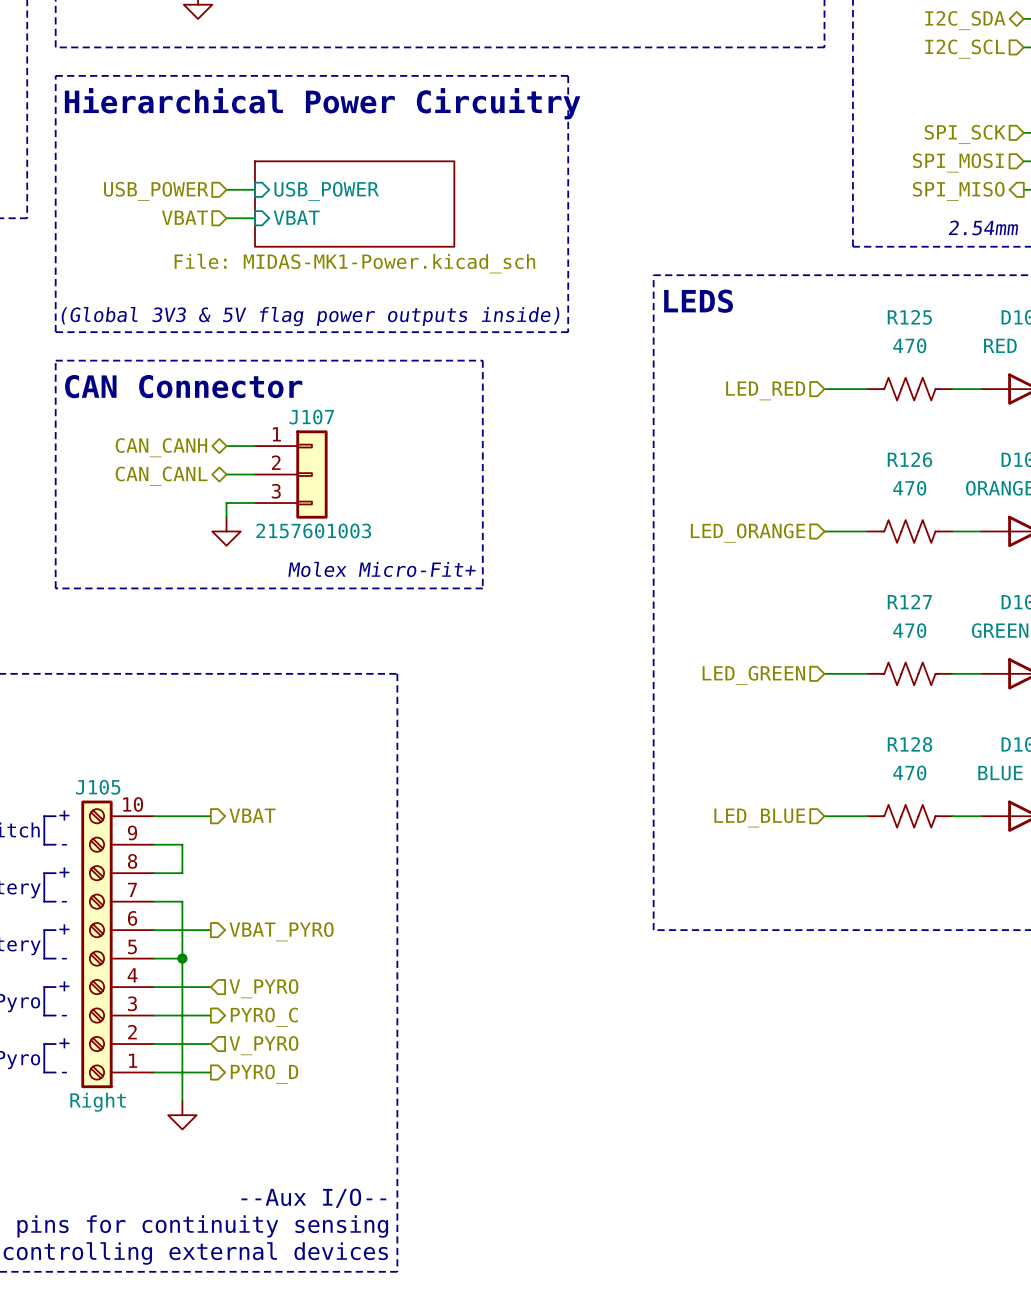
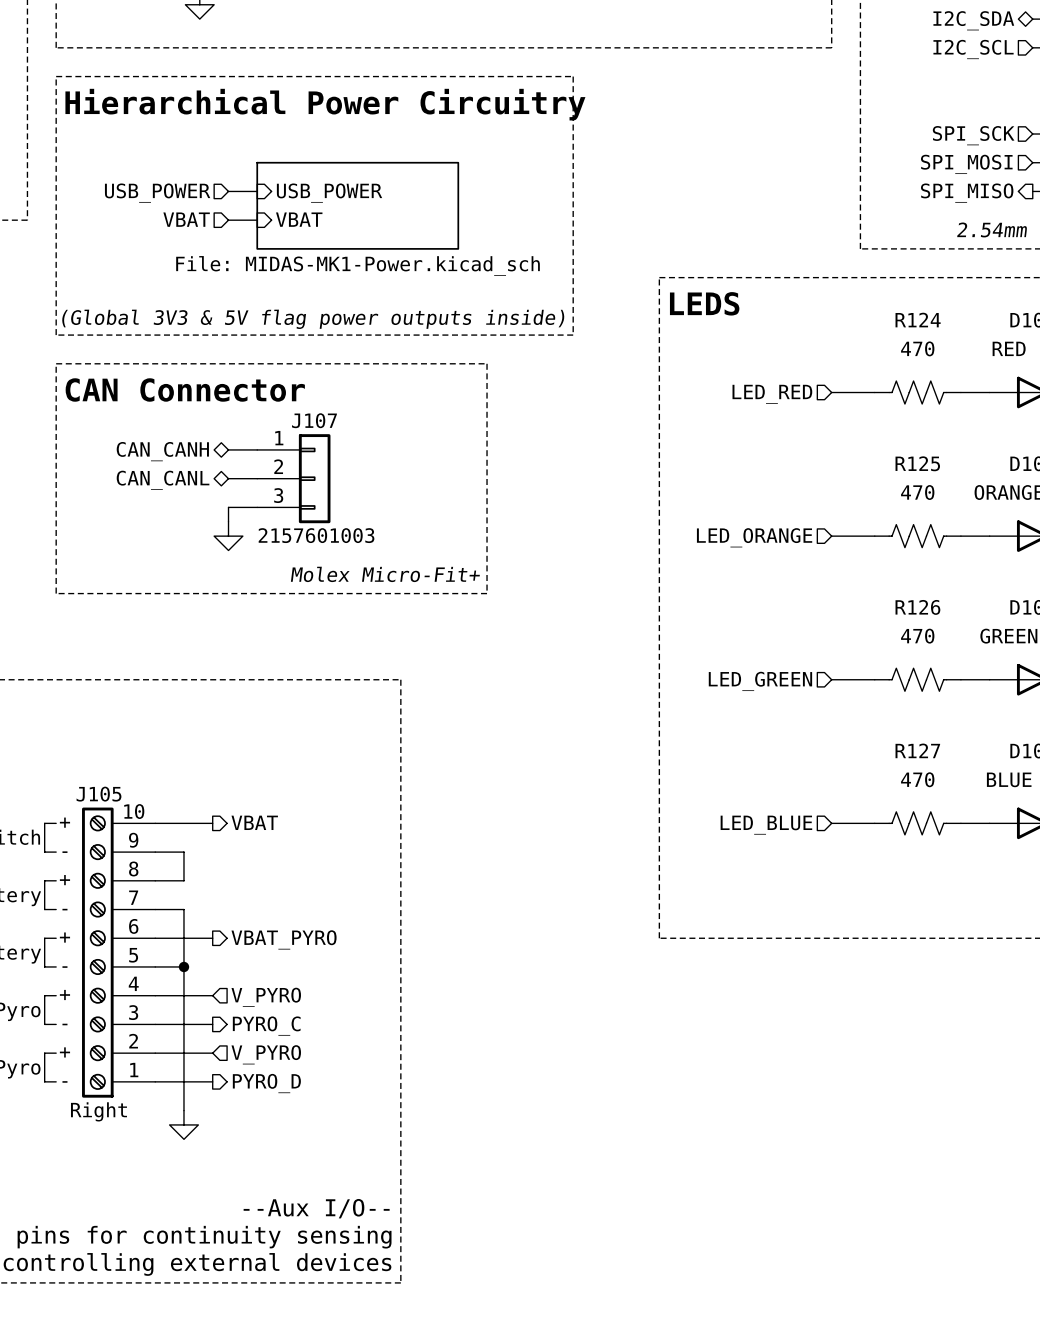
R125 name: R125 (909, 317) -> R124 (918, 320)
R126 name: R126 (909, 459) -> R125 (917, 463)
R127 name: R127 (909, 602) -> R126 (917, 607)
R128 name: R128 (909, 744) -> R127 (917, 750)

